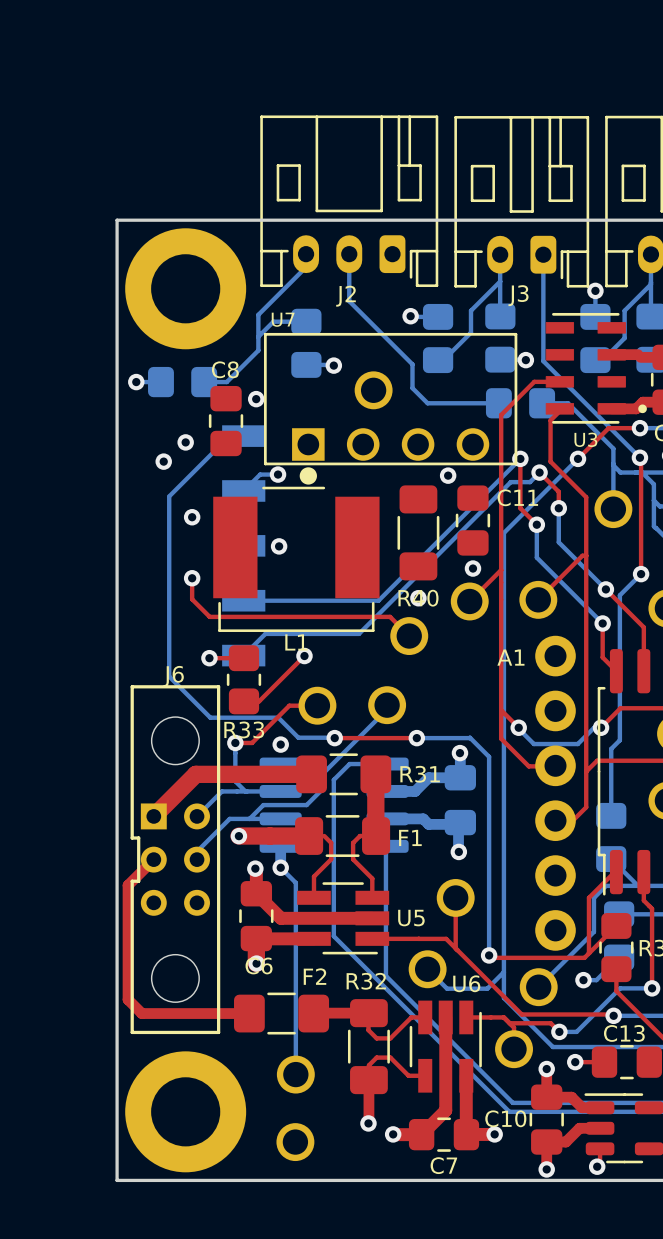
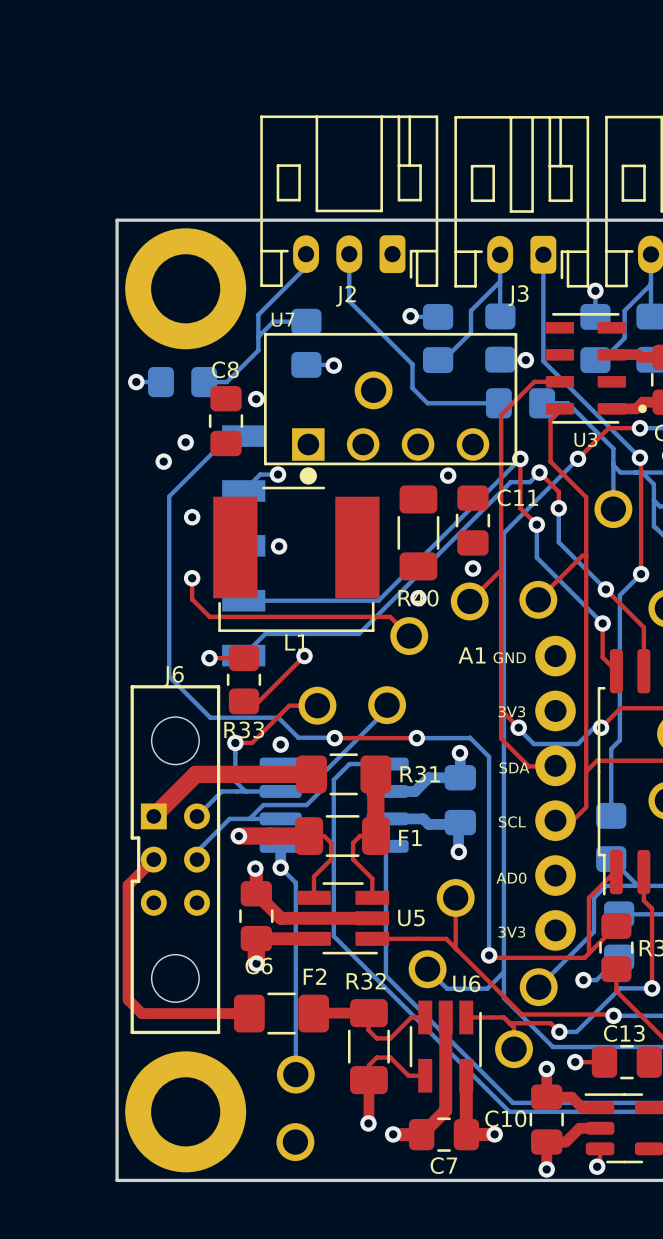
text: none -> GND (509, 657)
A1 name position: A1 (510, 657) -> A1 (472, 655)
text: none -> 3V3 (511, 711)
text: none -> SDA (514, 767)
text: none -> SCL (512, 821)
text: none -> AD0 (511, 878)
text: none -> 3V3 (511, 932)

